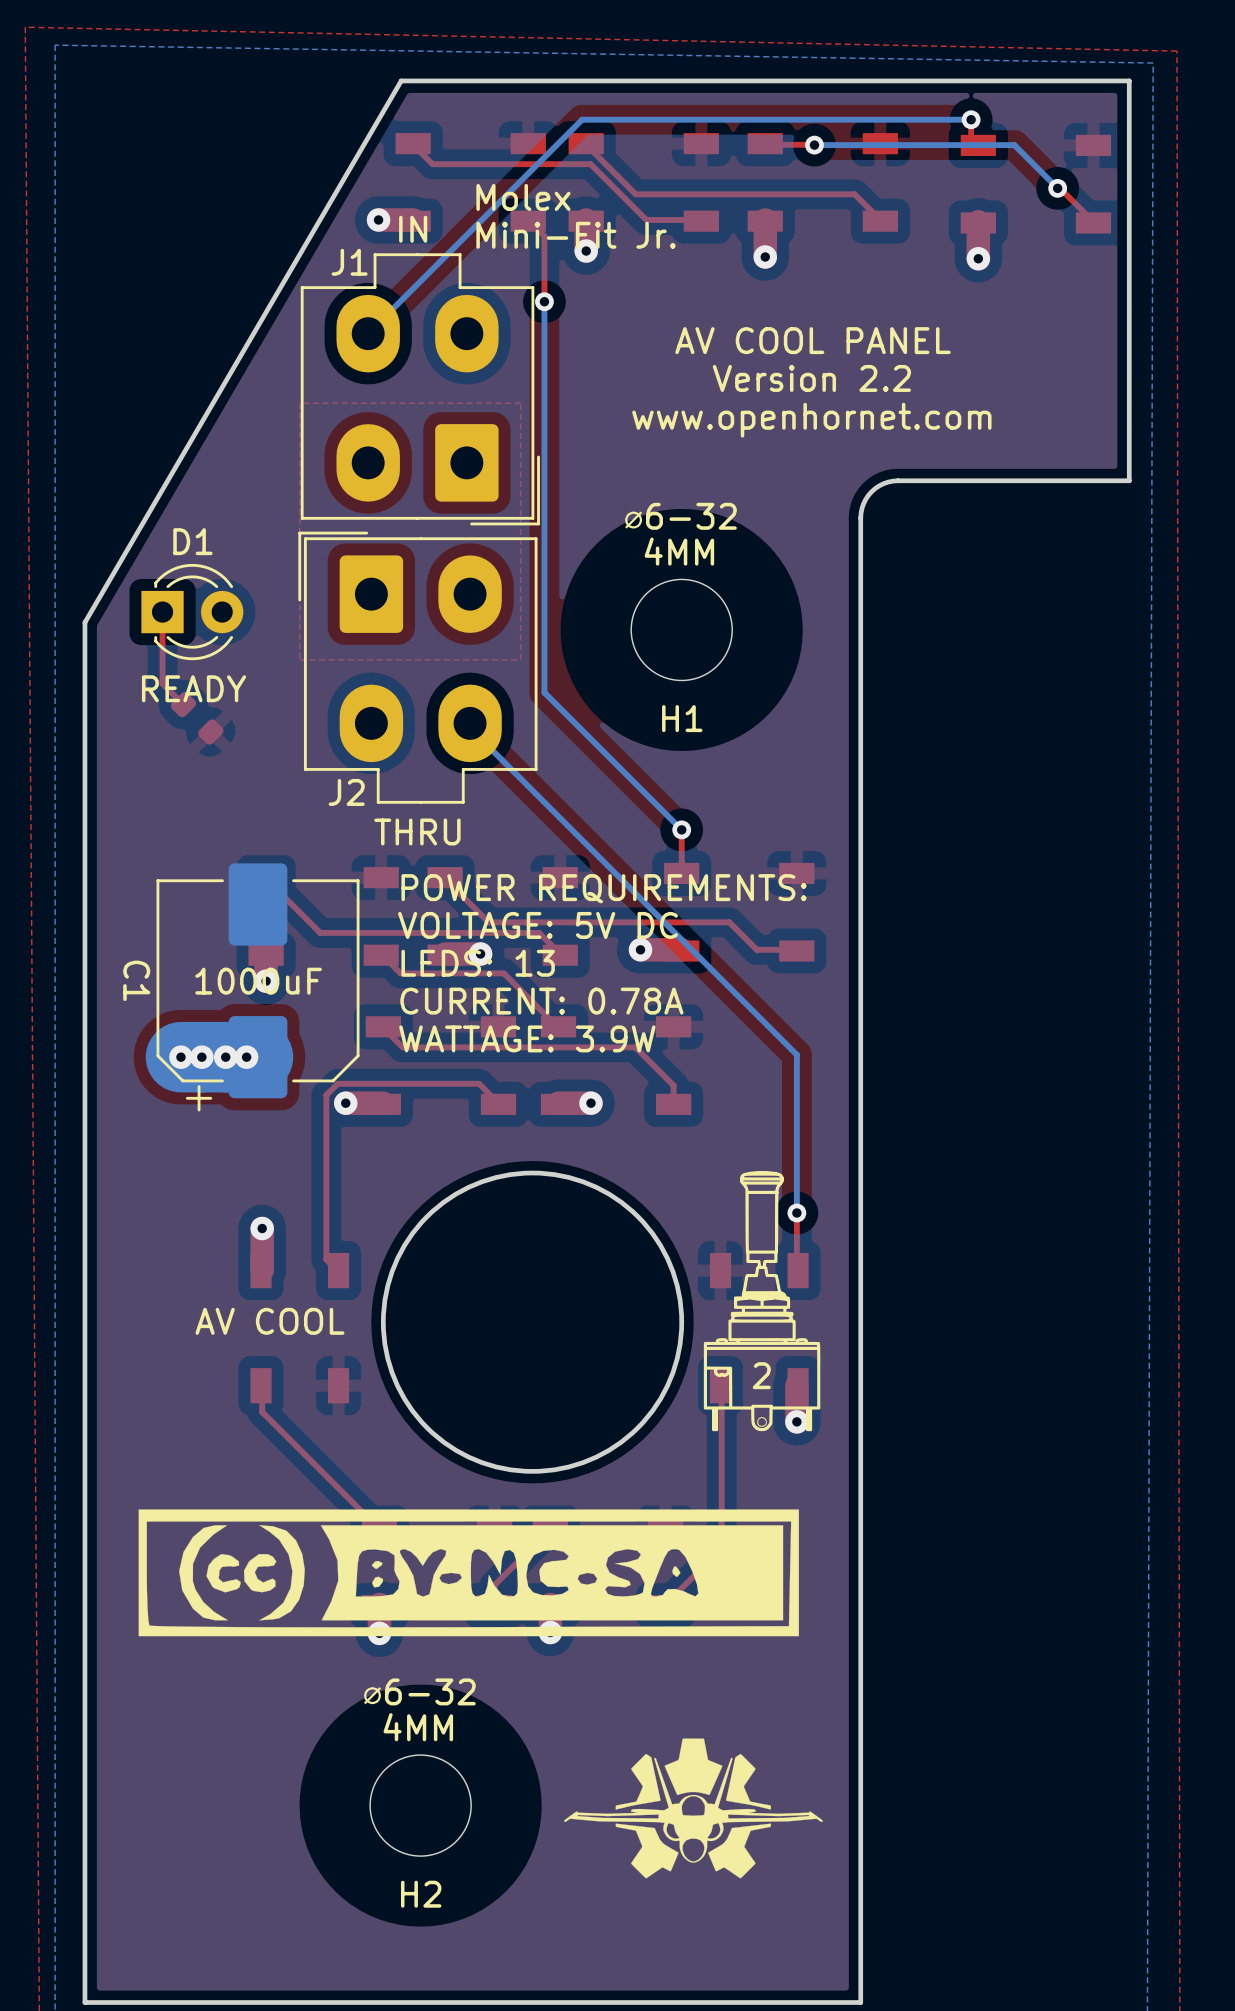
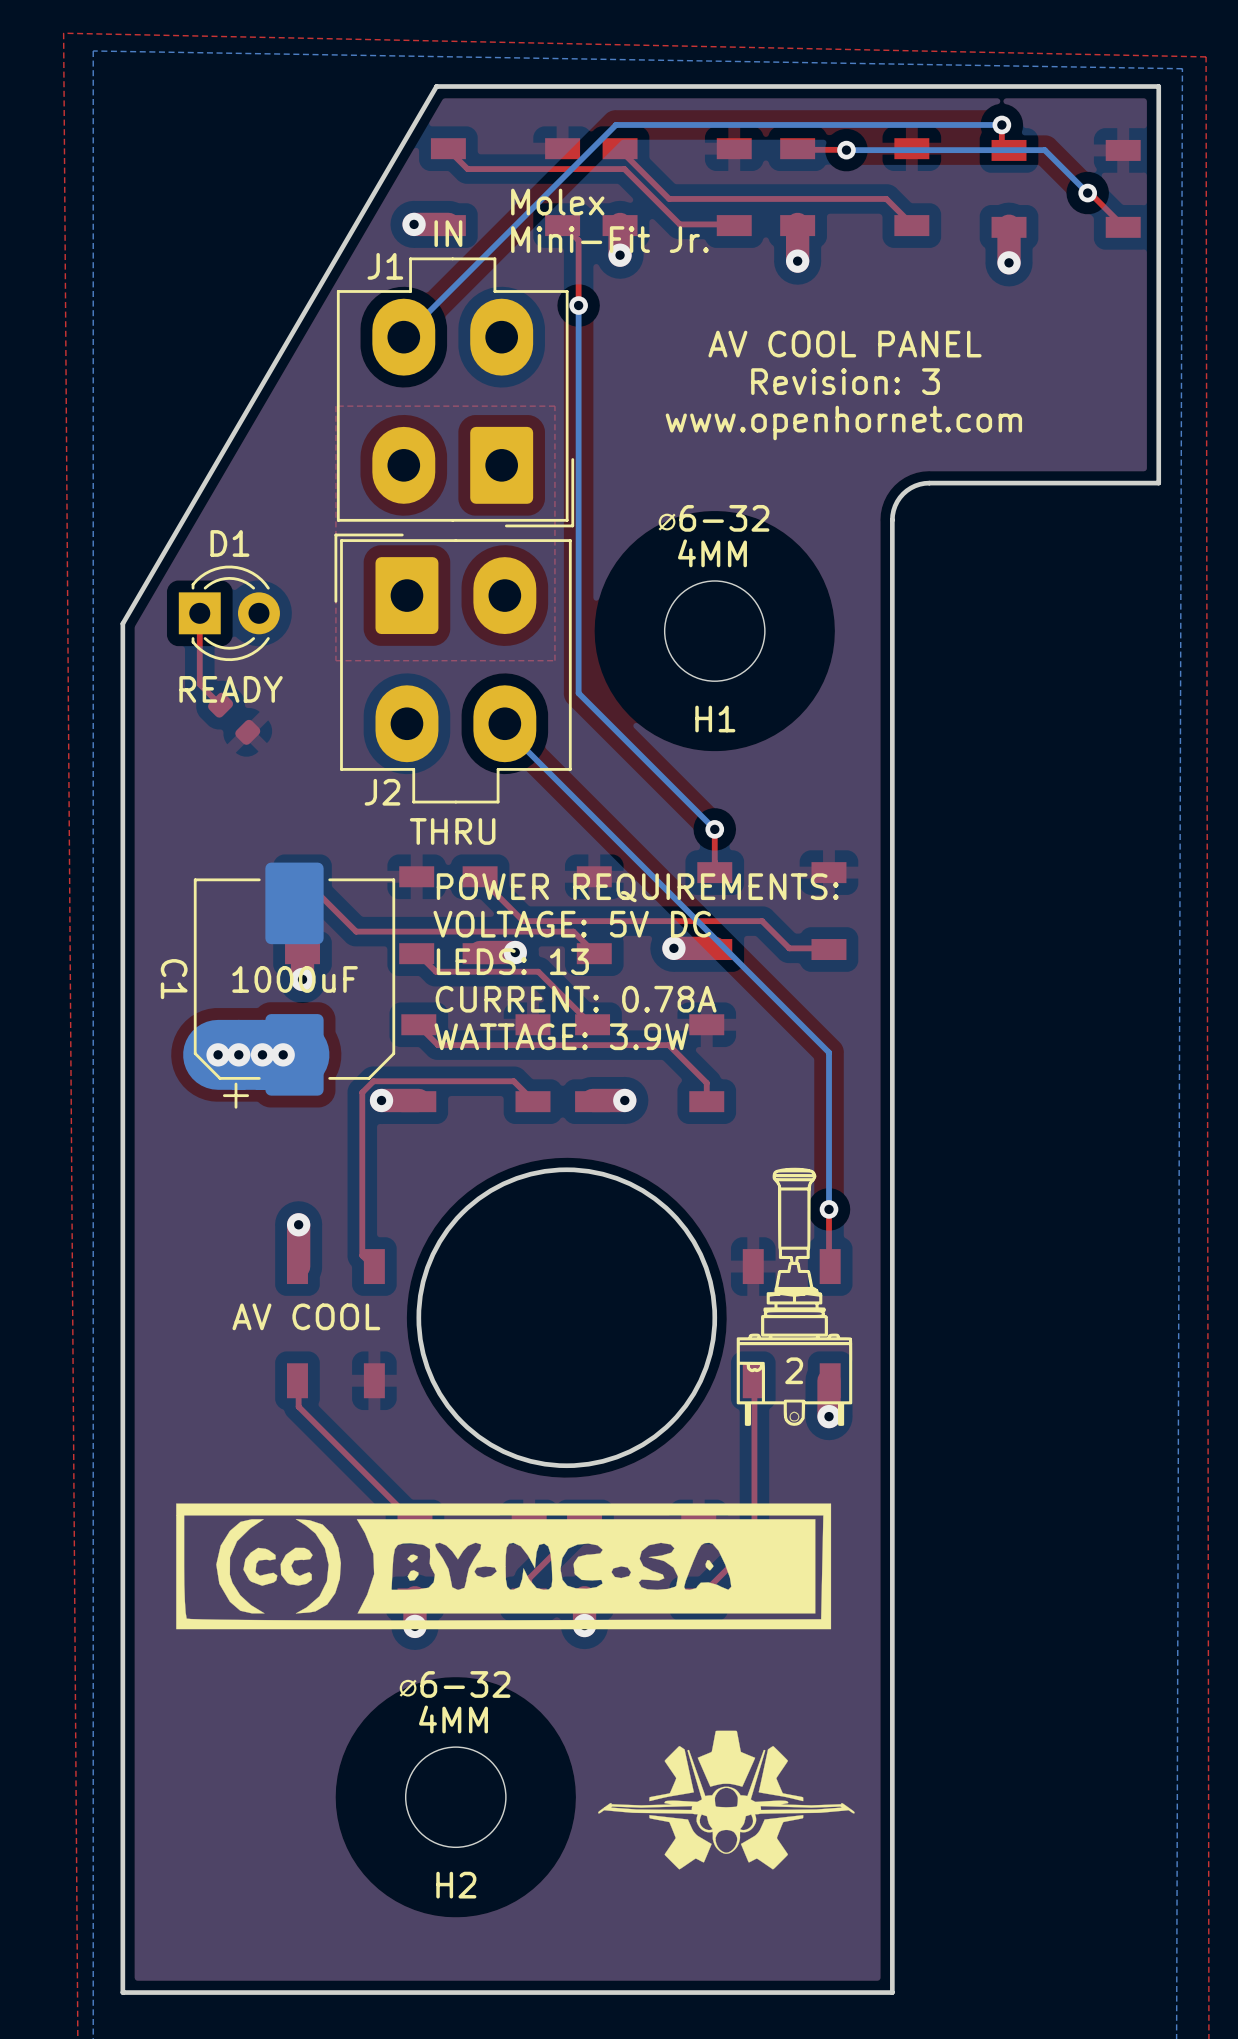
text: Version 2.2 (811, 378) -> Revision: 3 (845, 381)

